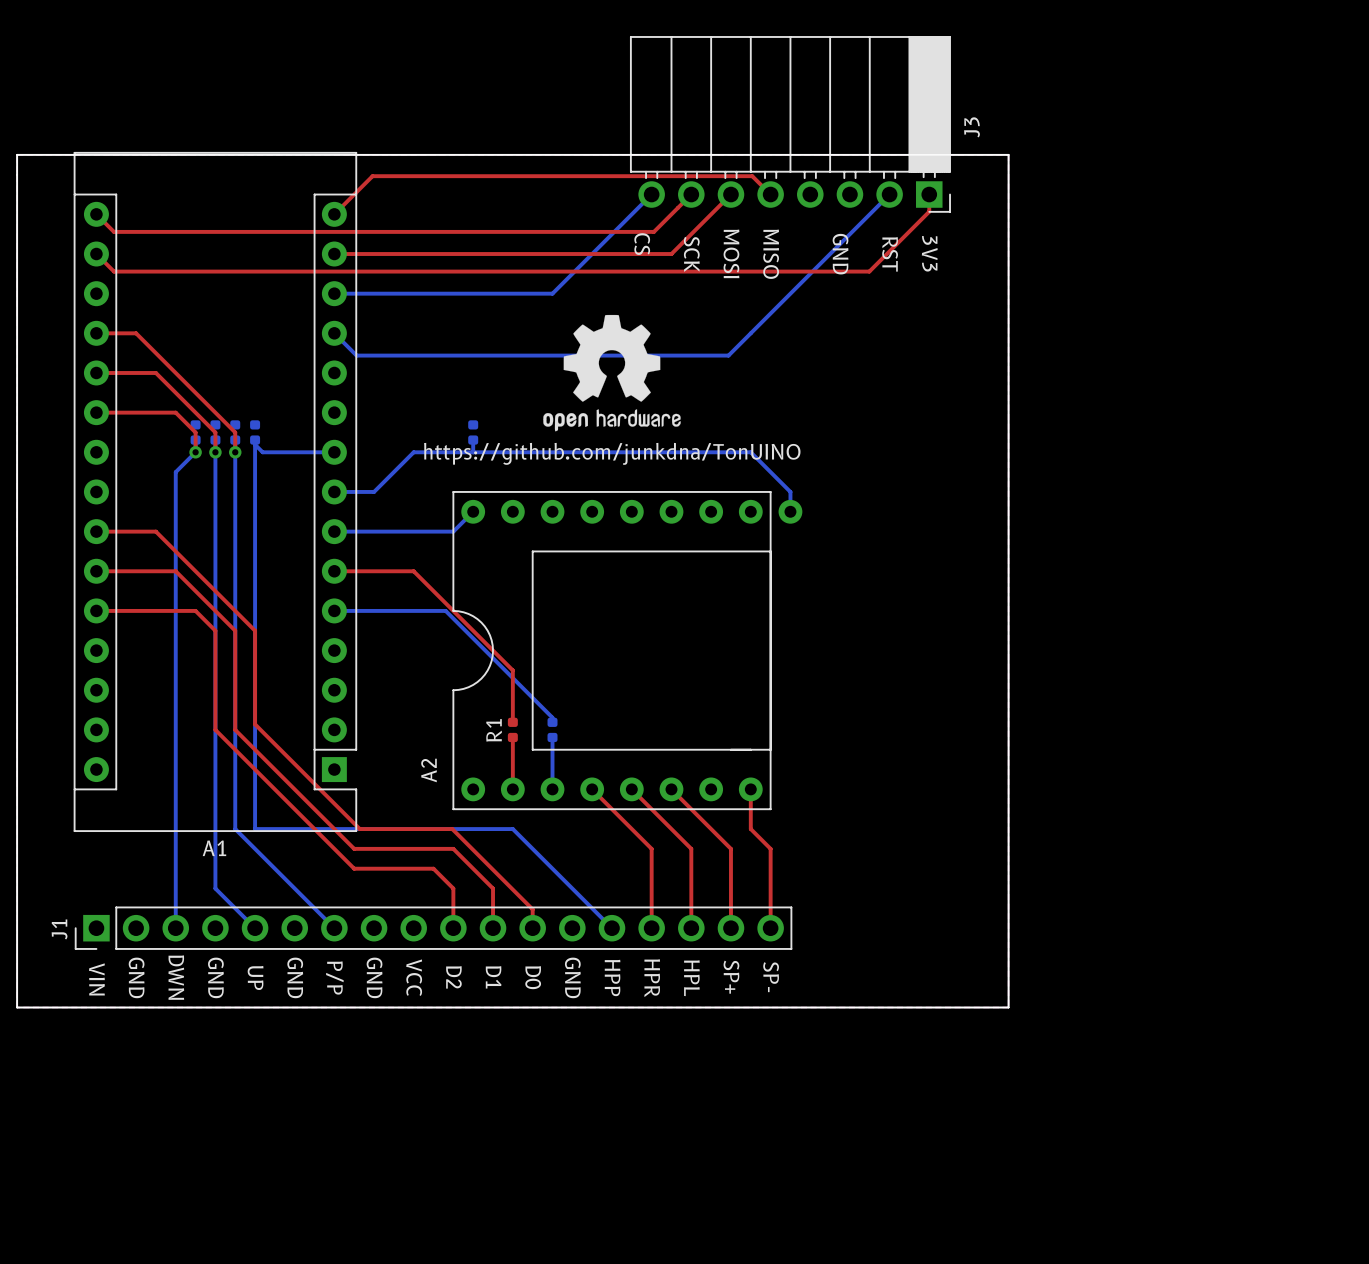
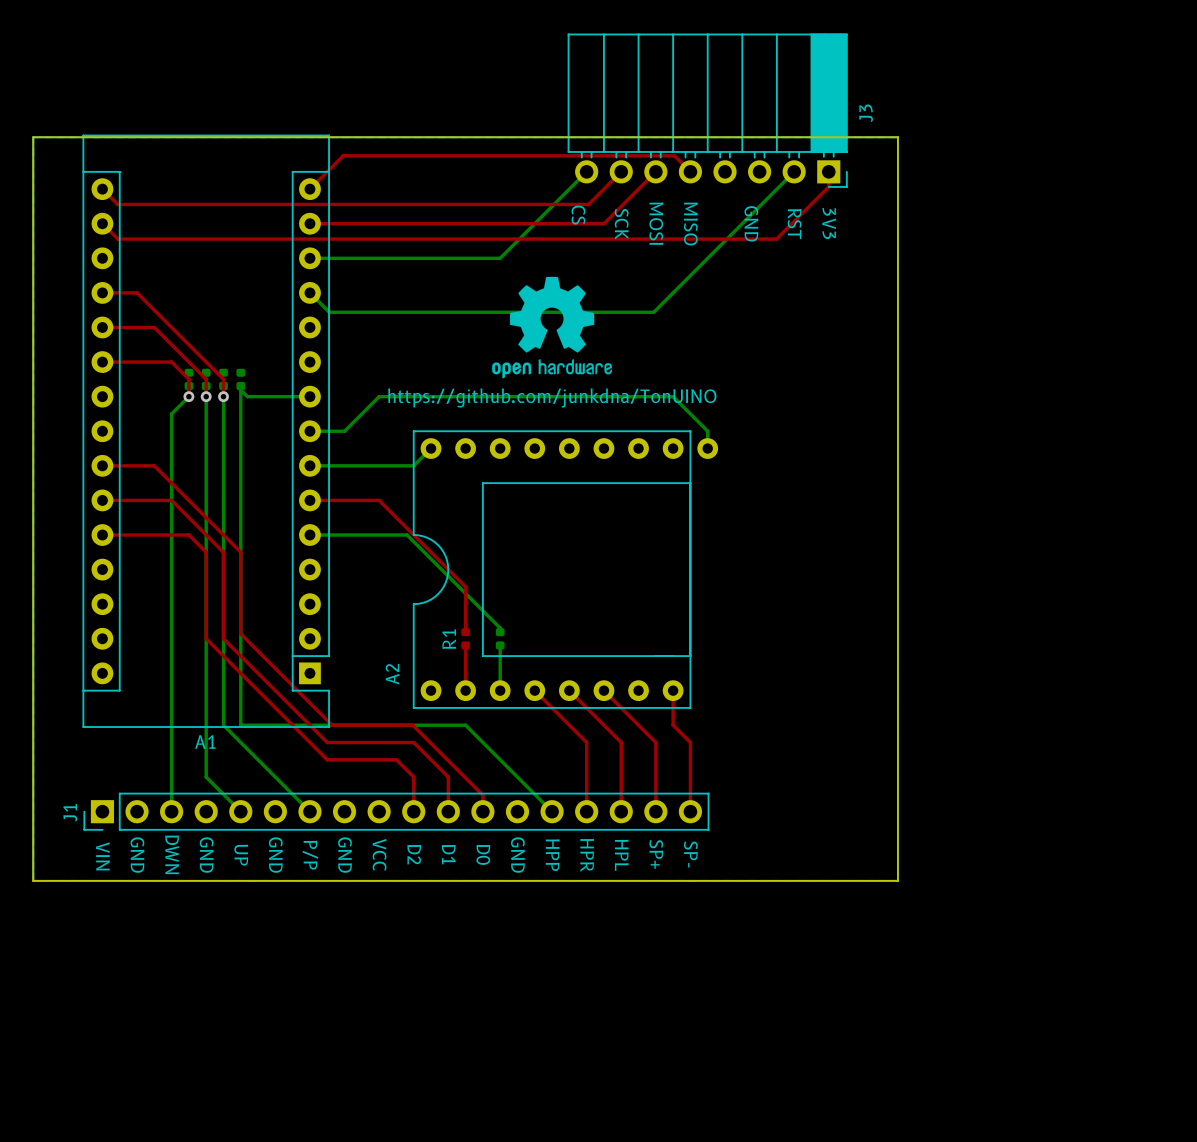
part: (473, 432) -> none
bottom track: (473, 440) (473, 452) -> none

